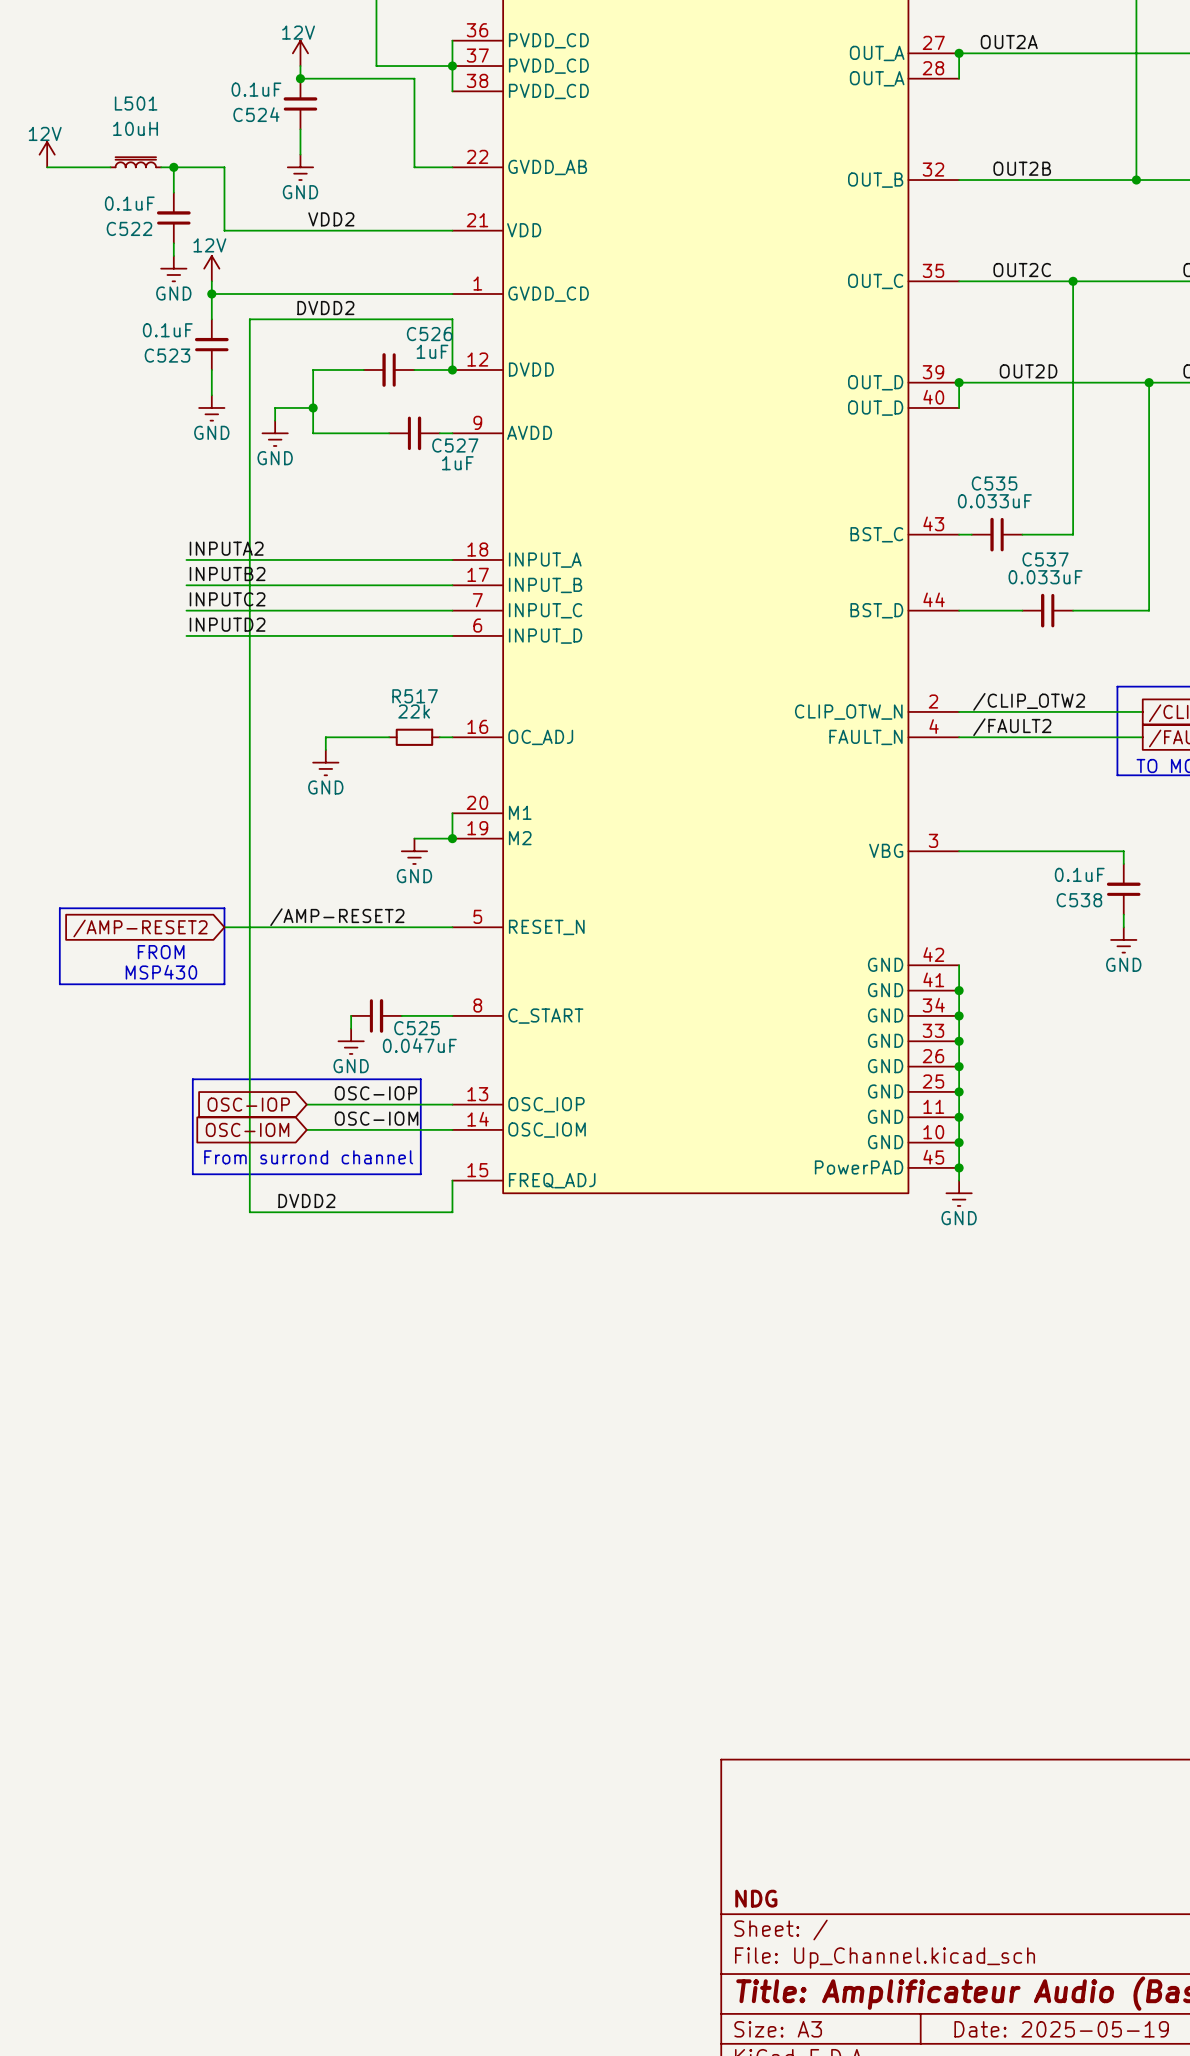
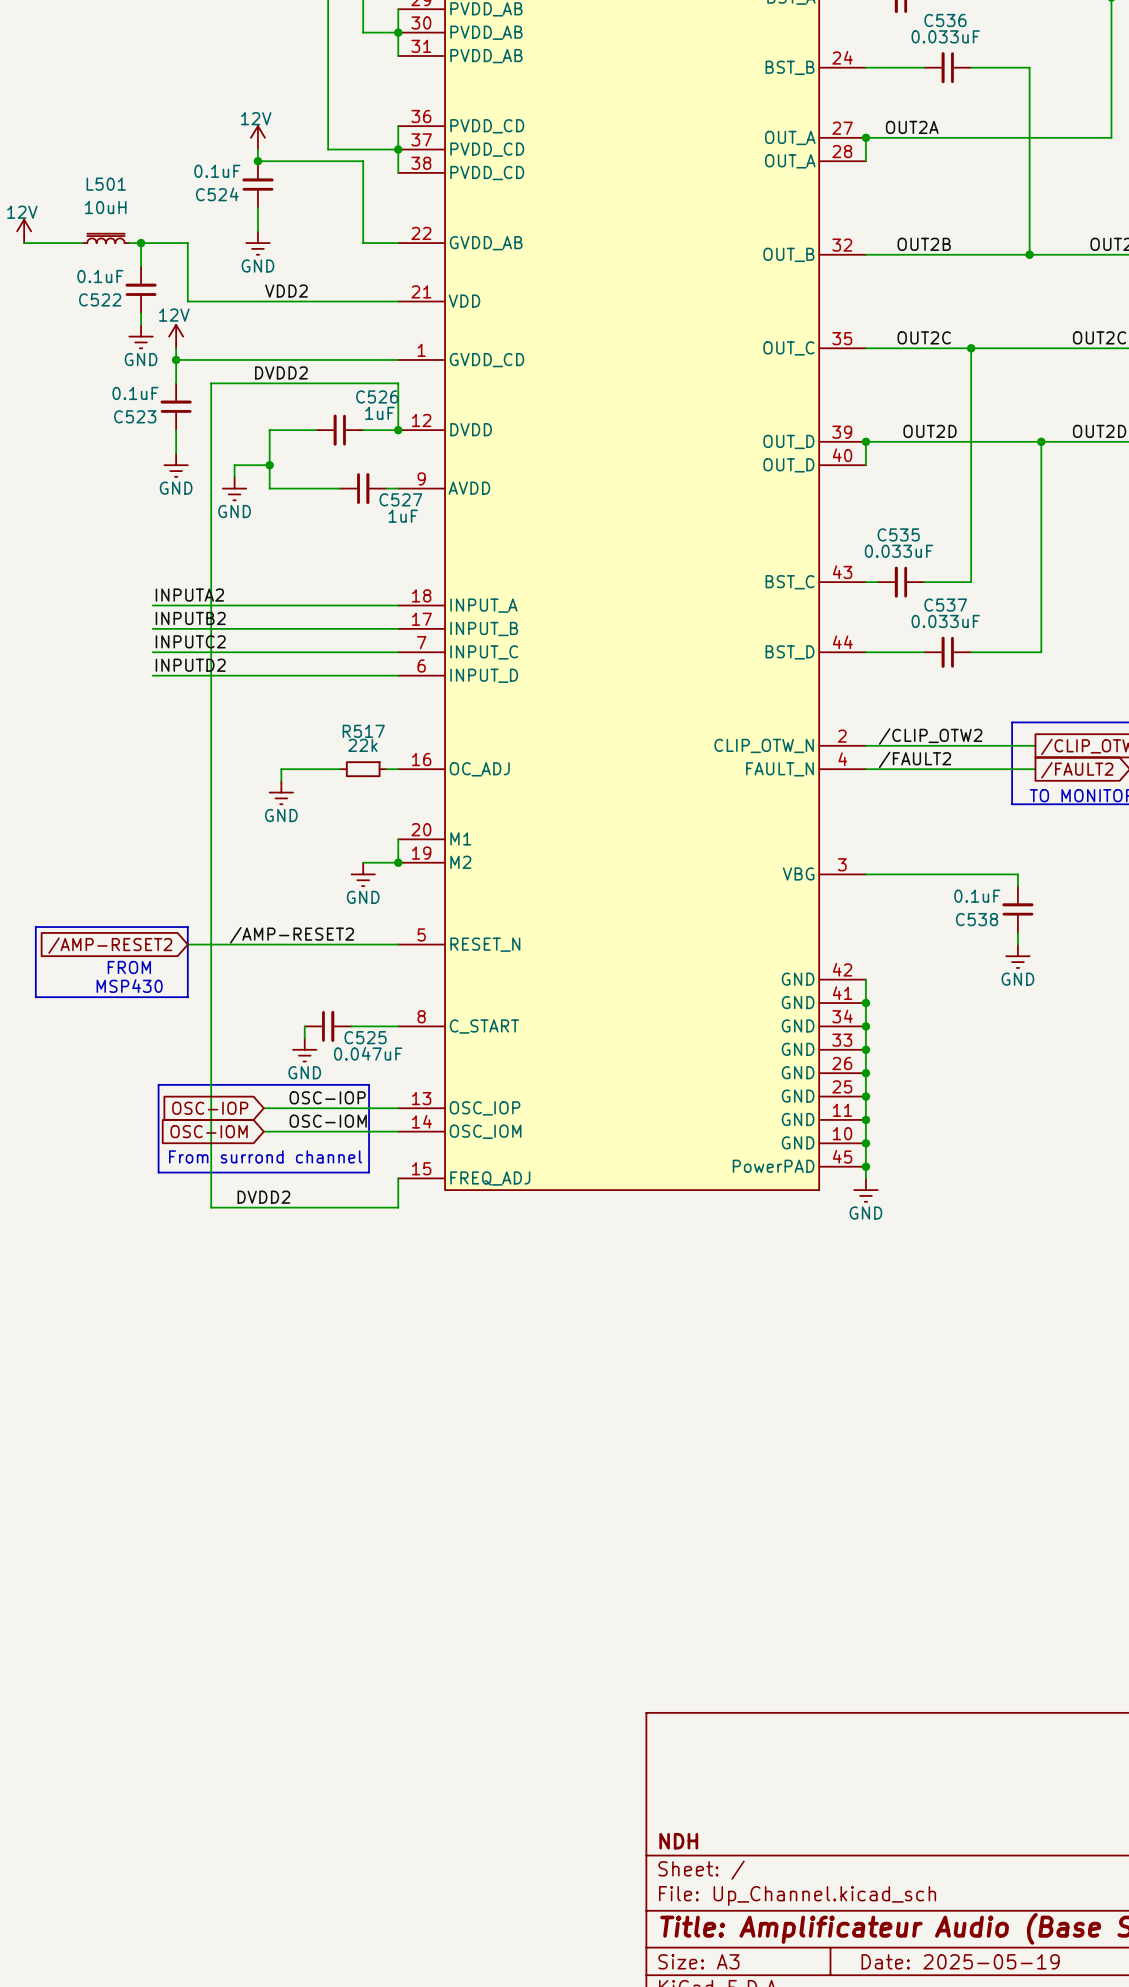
title block: NDG (756, 1898) -> NDH (678, 1841)

